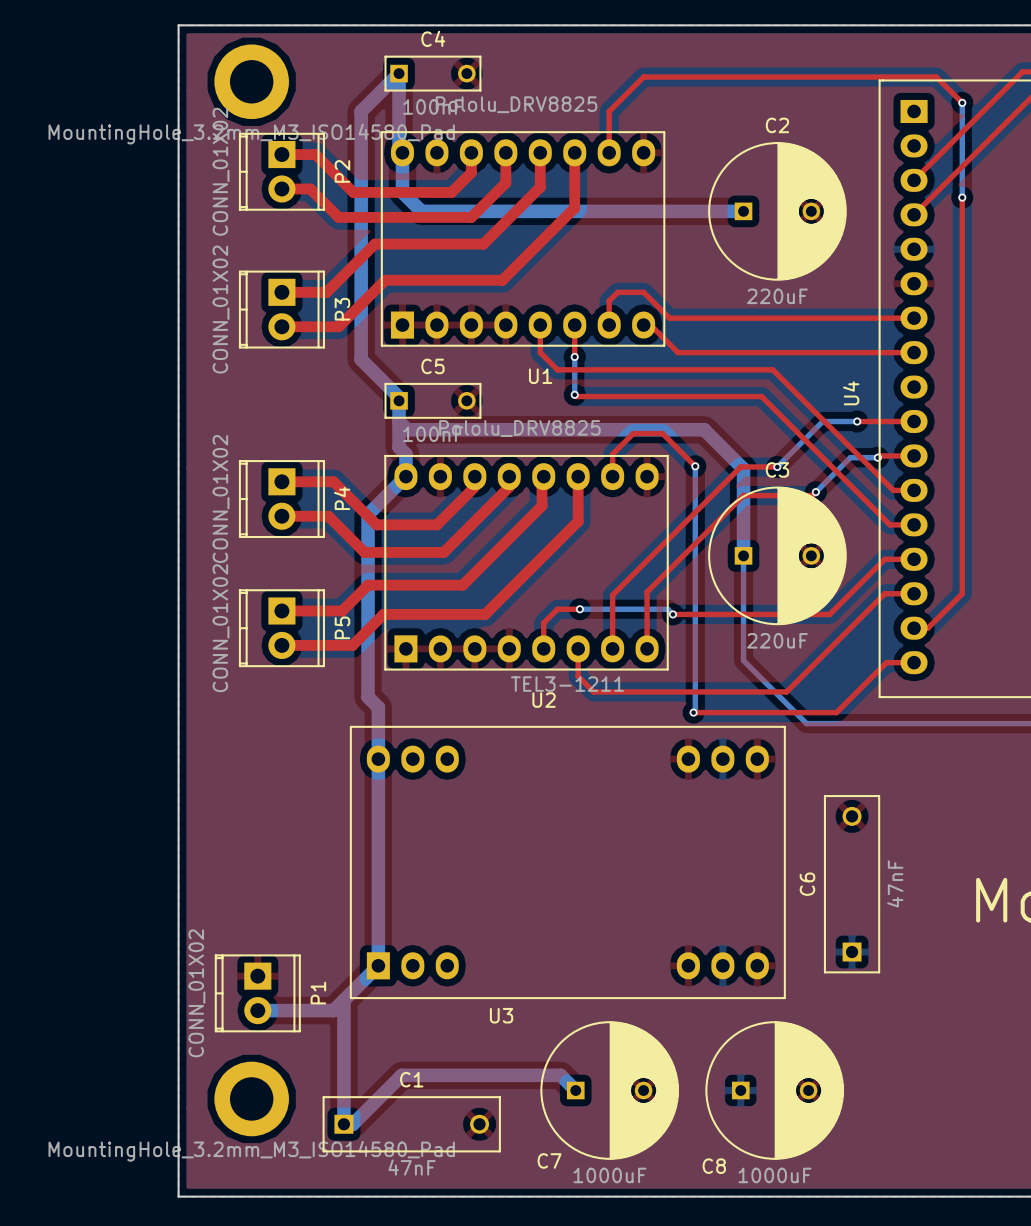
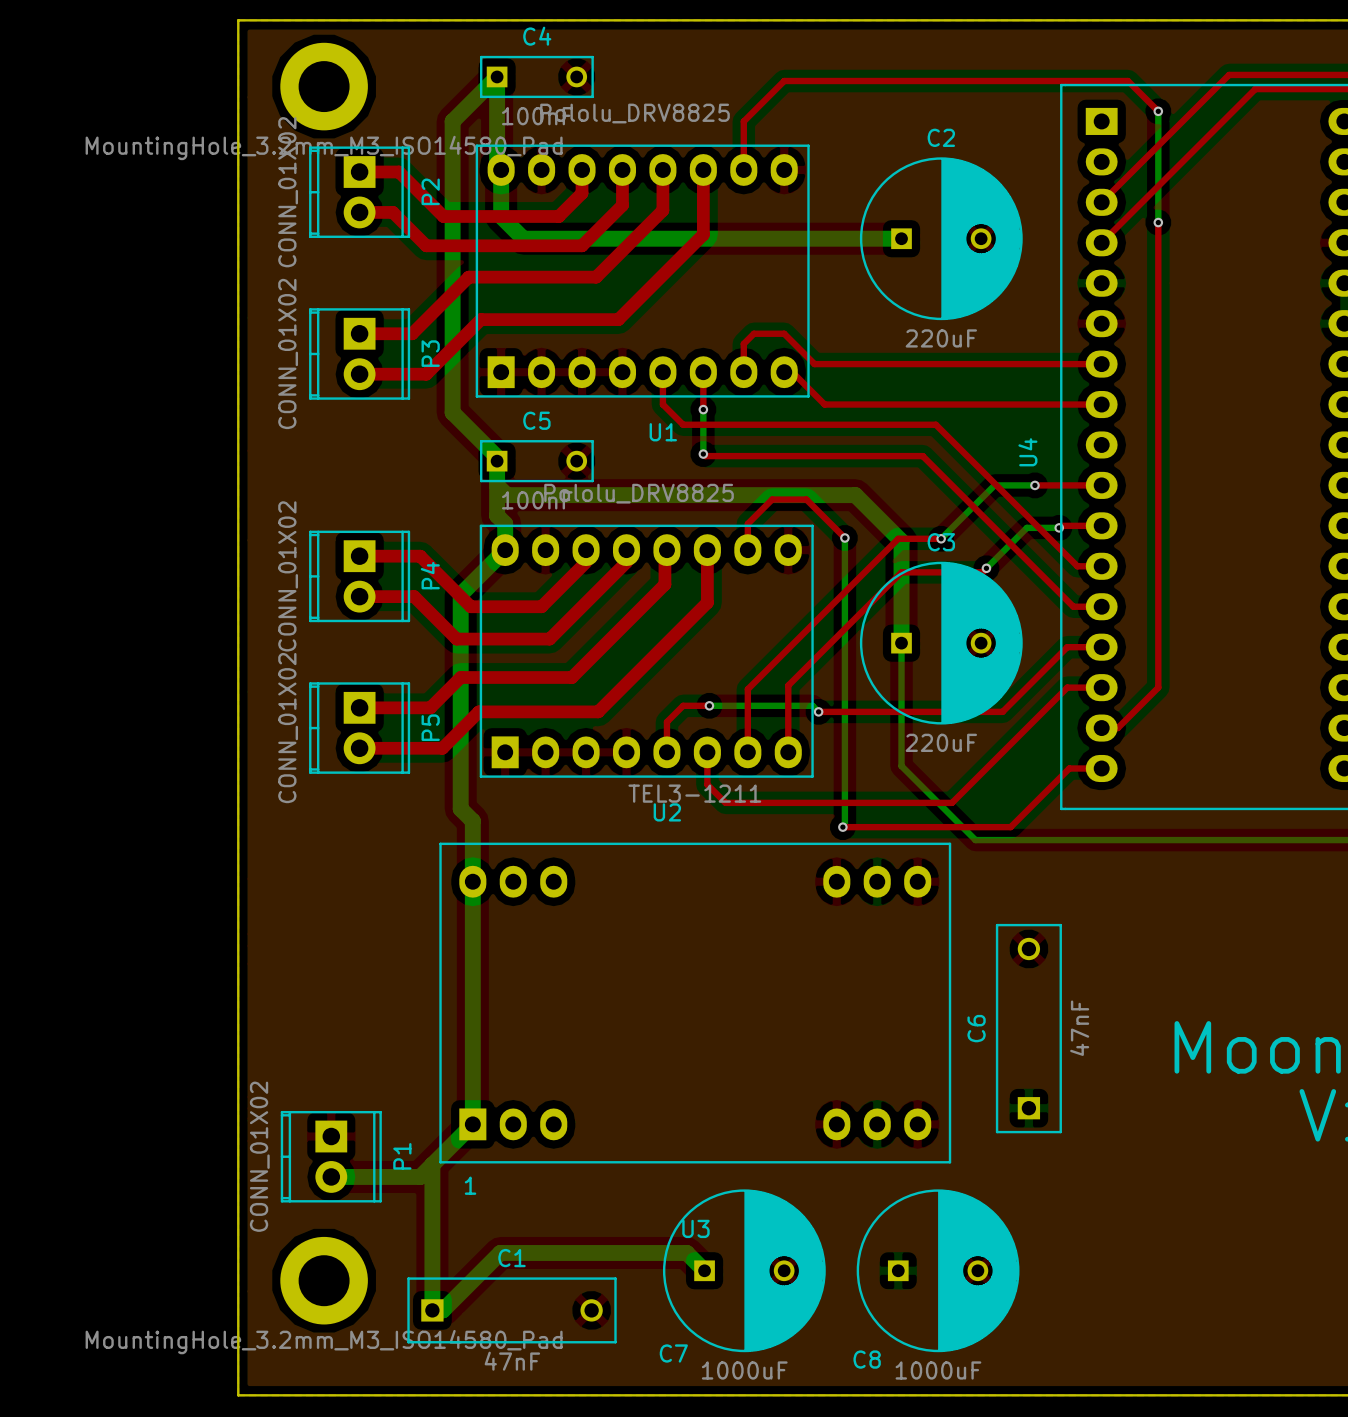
U3 name position: U3 (501, 1015) -> U3 (695, 1228)
U3 text: none -> 1 (470, 1185)

